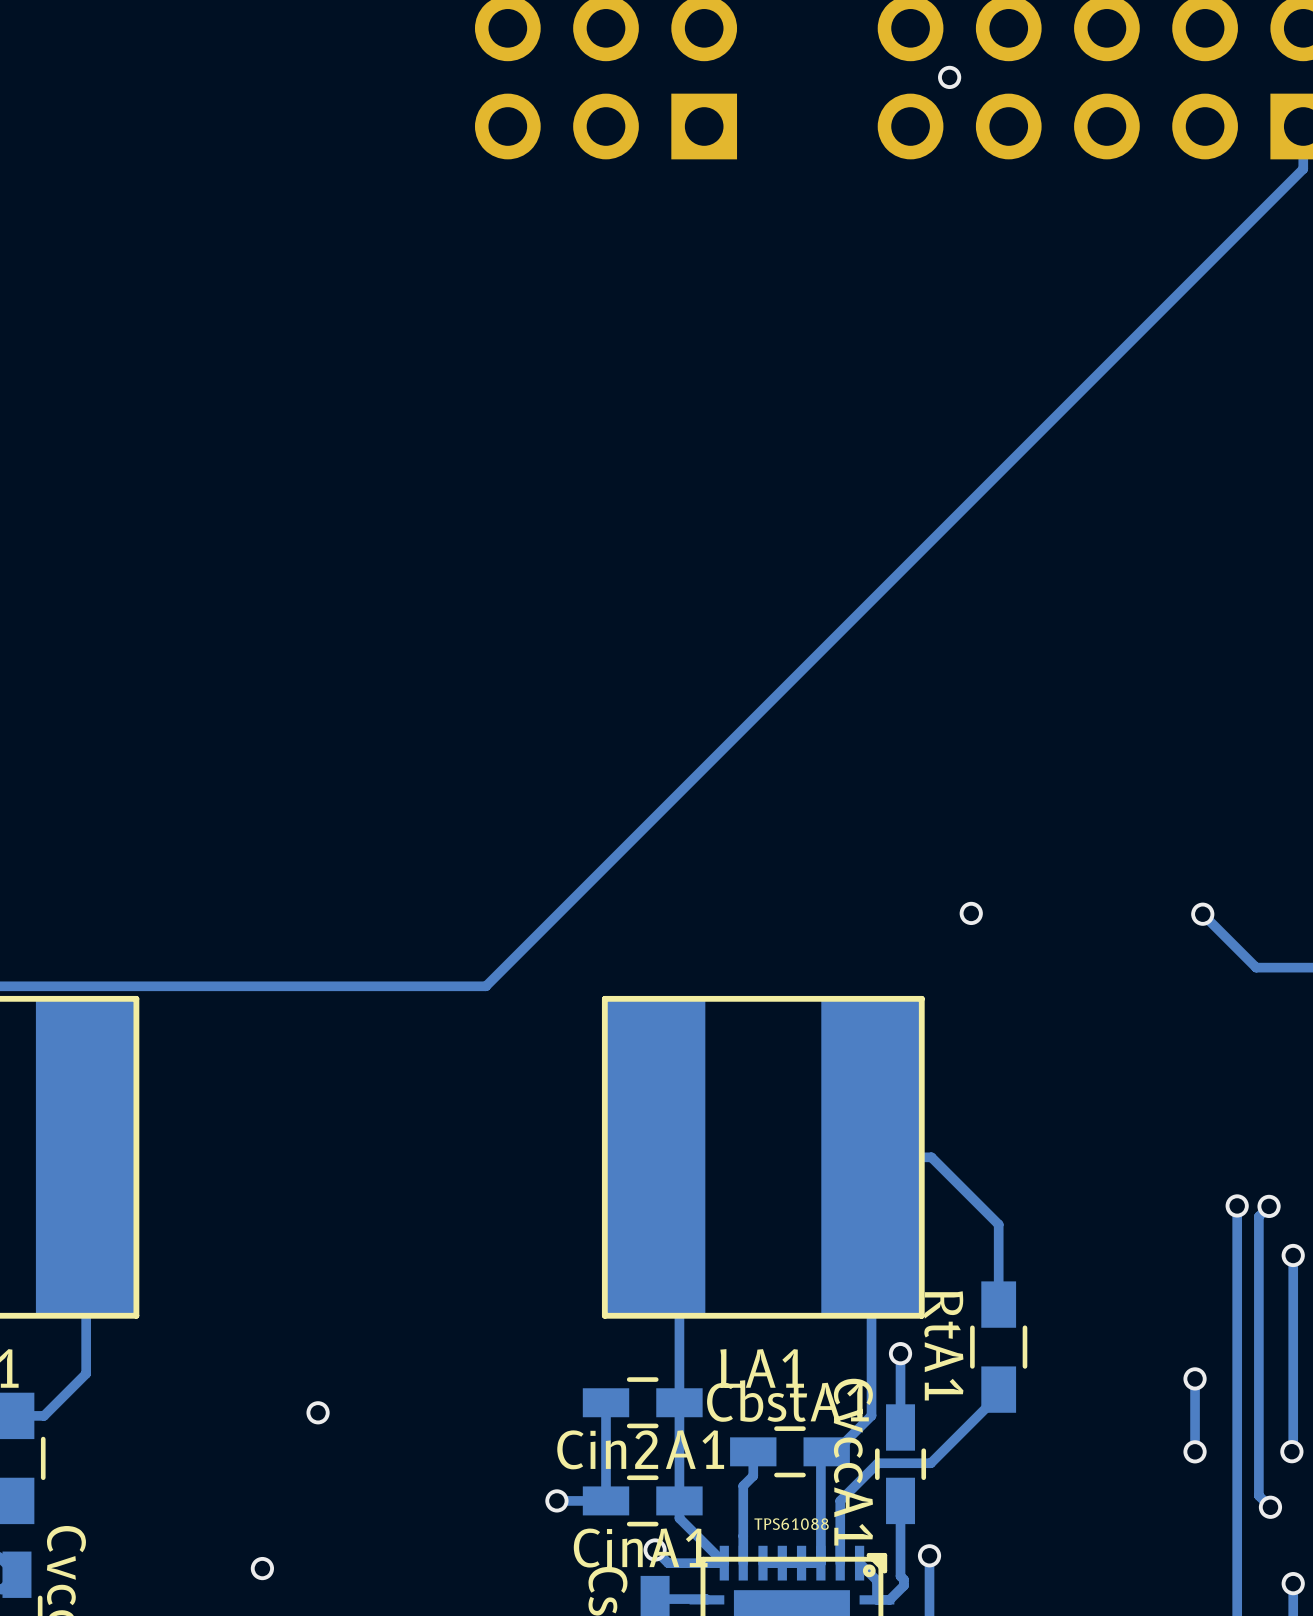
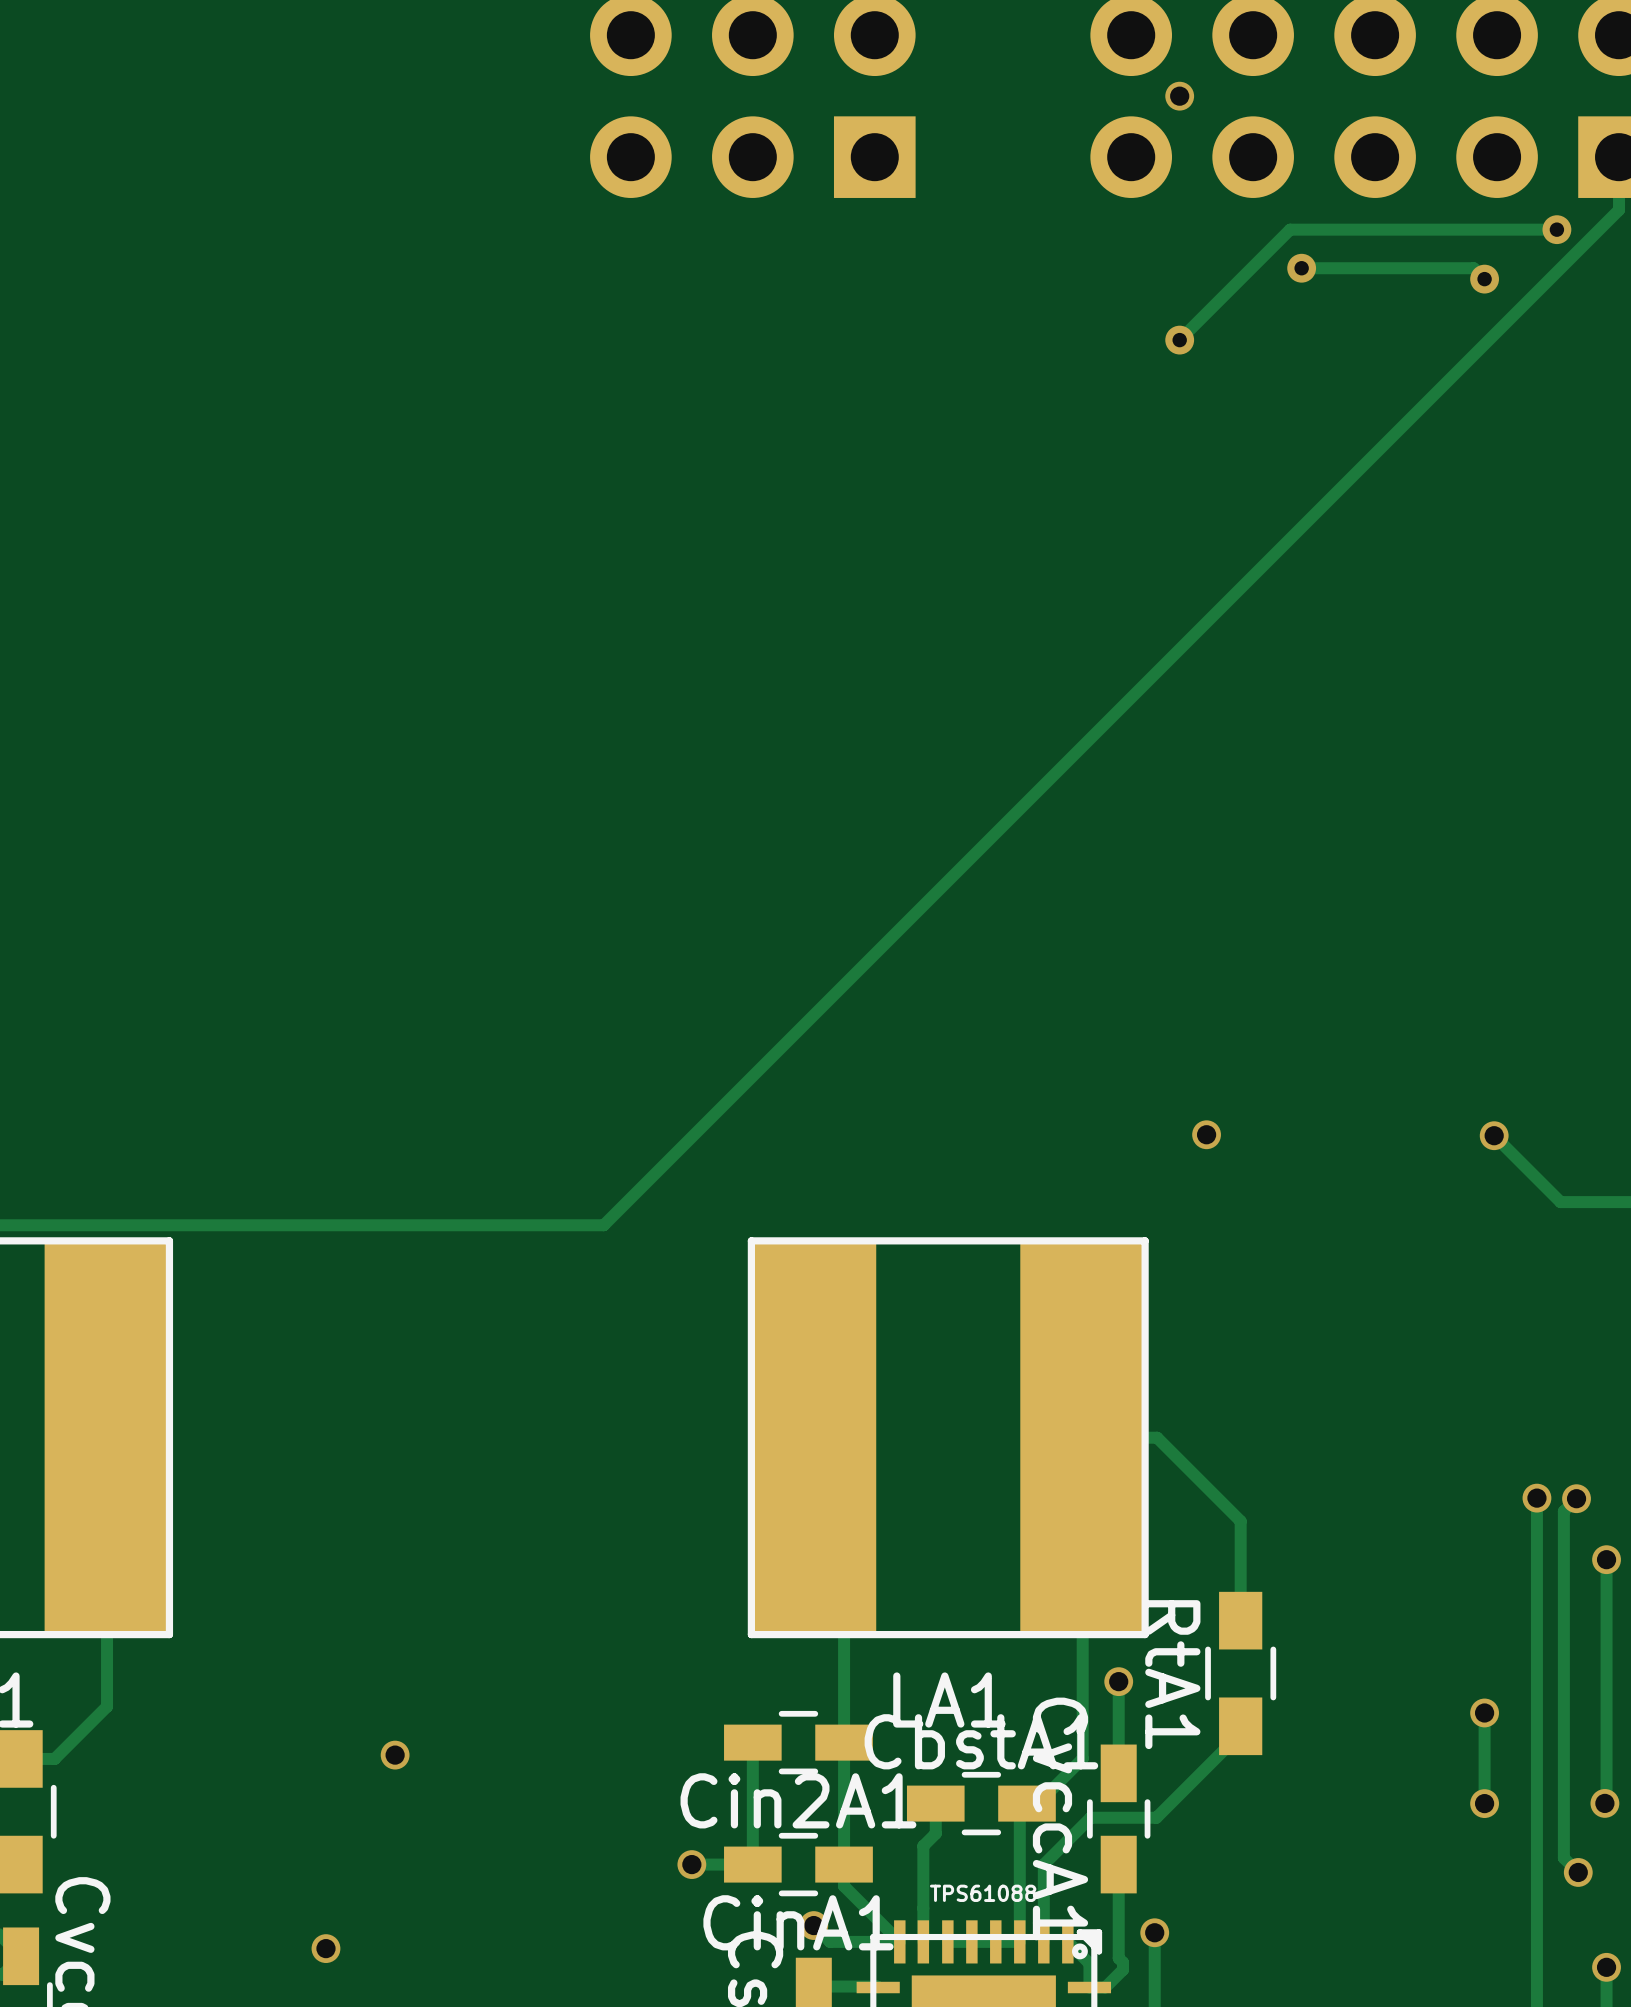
track: none -> (1556, 229) (1290, 229) (1179, 340)
via: none -> (1556, 229)
track: none -> (1301, 268) (1473, 268) (1484, 279)
via: none -> (1301, 268)
via: none -> (1484, 279)
via: none -> (1179, 340)

